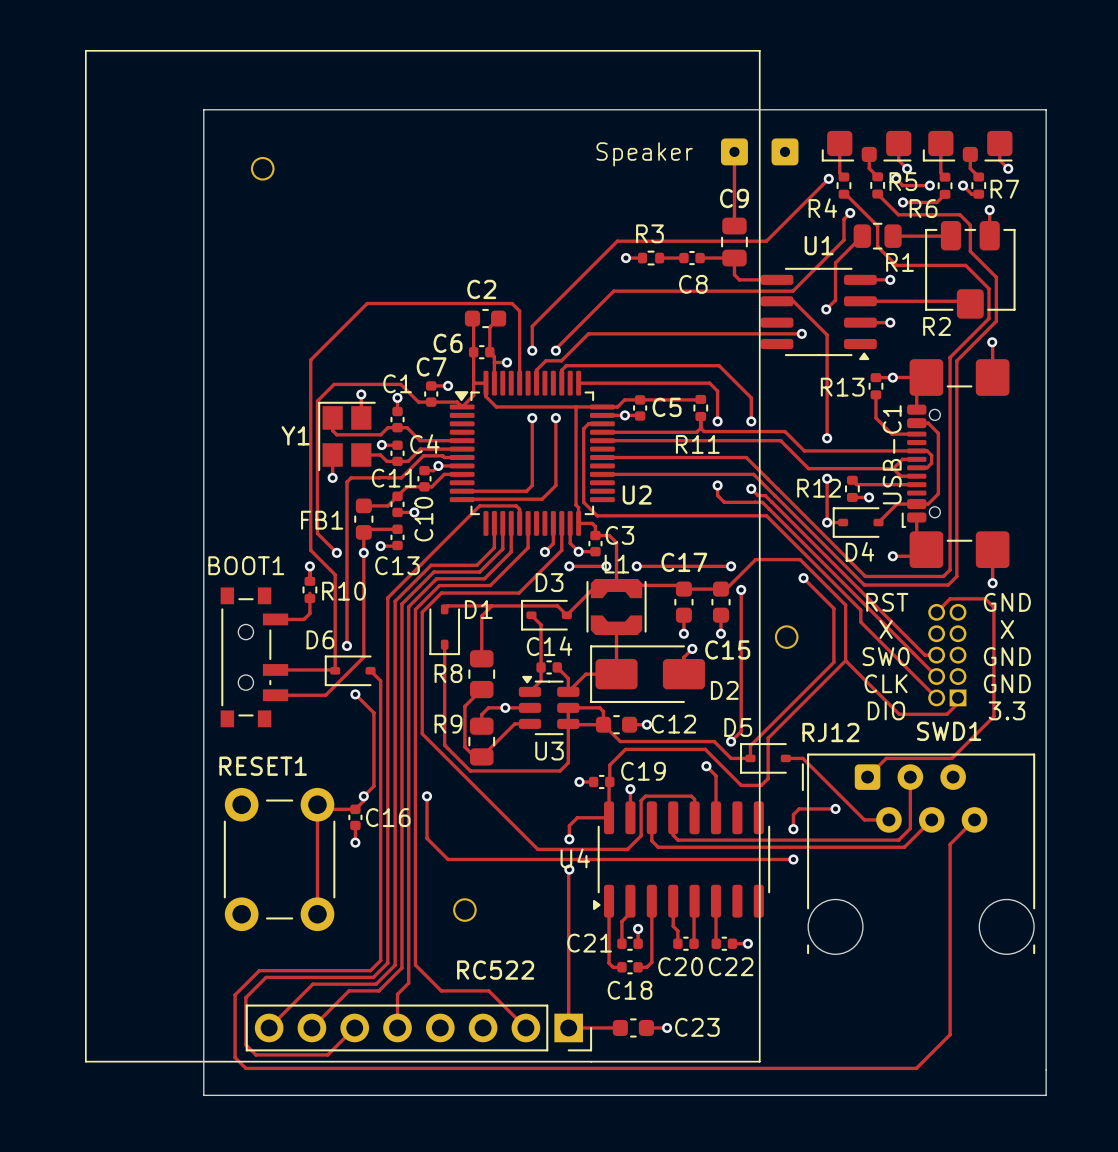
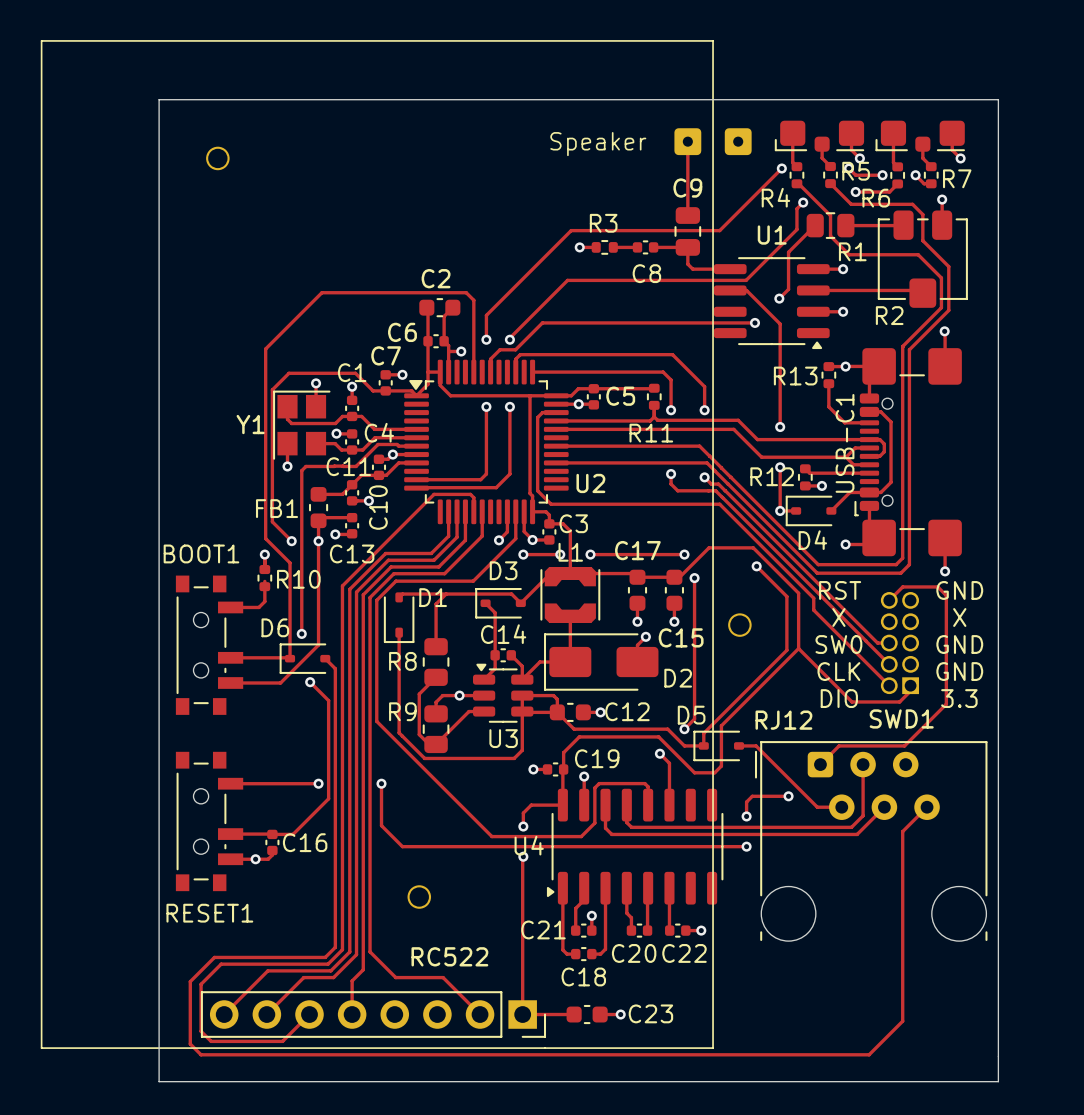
RESET1 name position: RESET1 (263, 766) -> RESET1 (209, 913)
track: (373, 786) (363, 796) (363, 800) (355, 809) (322, 809) (317, 804) (317, 863) -> (328, 773) (328, 798) (293, 834) (272, 834)
RESET1 footprint: [223, 787, 336, 932] -> [175, 751, 244, 892]
track: none -> (230, 783) (318, 783)
C16 position: (355, 817) -> (272, 842)
track: (355, 825) (355, 842) -> none
via position: (355, 842) -> (255, 859)
track: none -> (230, 834) (272, 834)
track: (317, 867) (317, 914) -> (272, 855) (268, 859) (230, 859)

